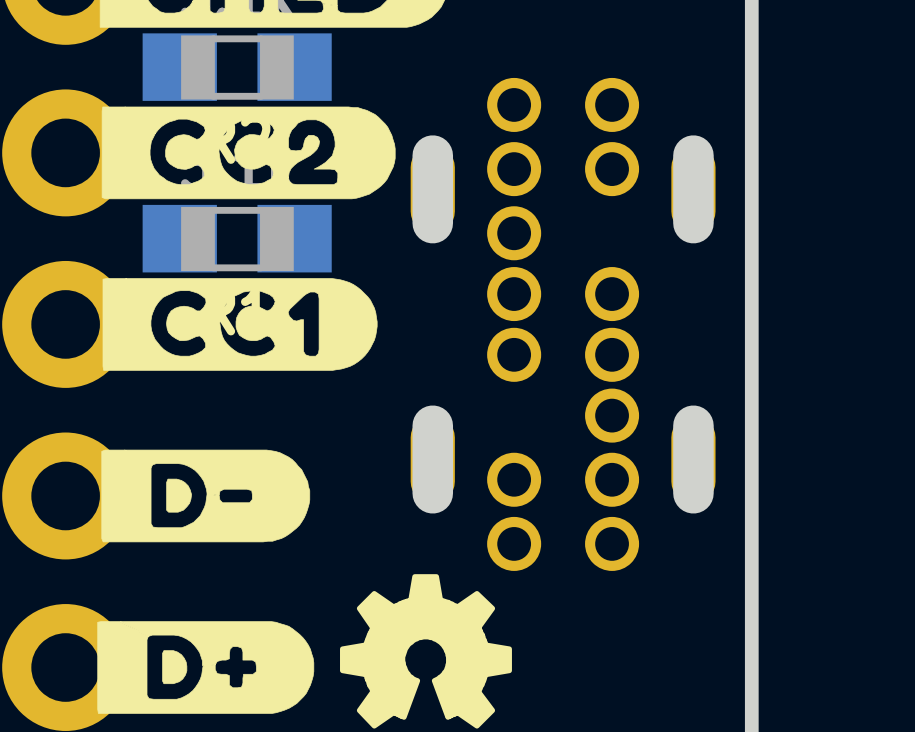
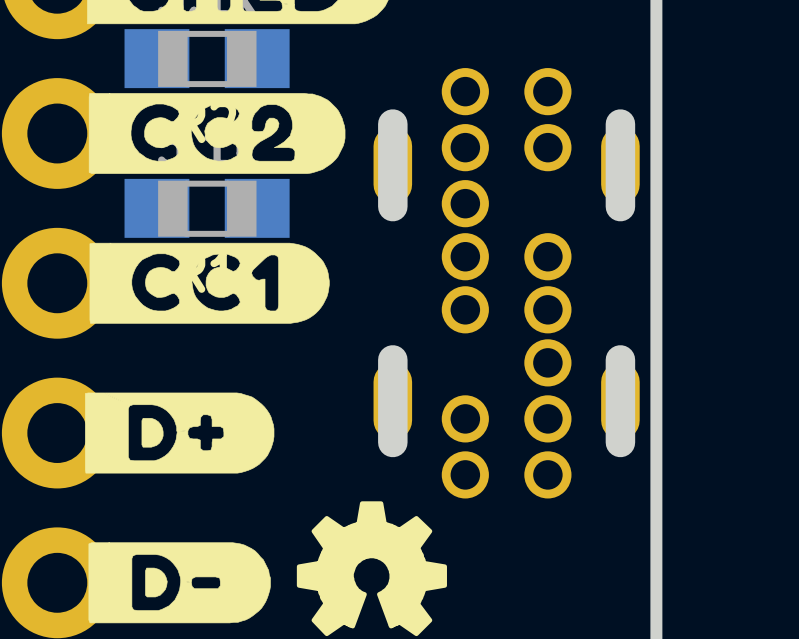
part footprint: [410, 77, 716, 571] -> [373, 68, 640, 499]
drawing position: (205, 495) -> (179, 582)
drawing position: (205, 667) -> (179, 433)

